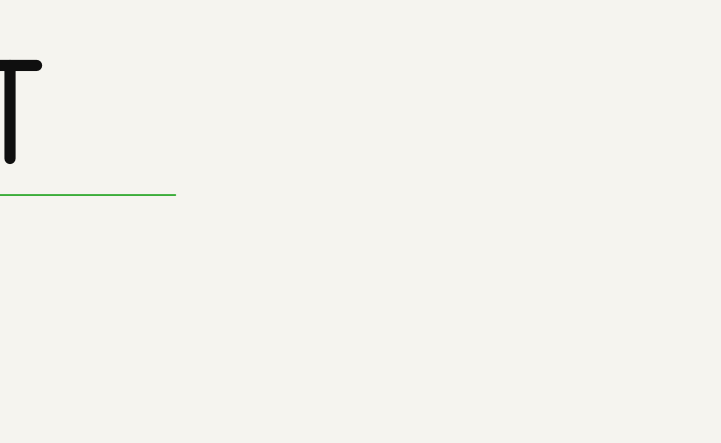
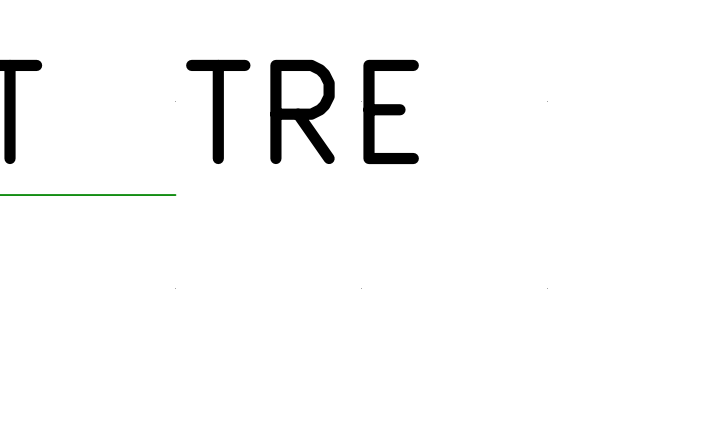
label: none -> TRE (302, 111)

